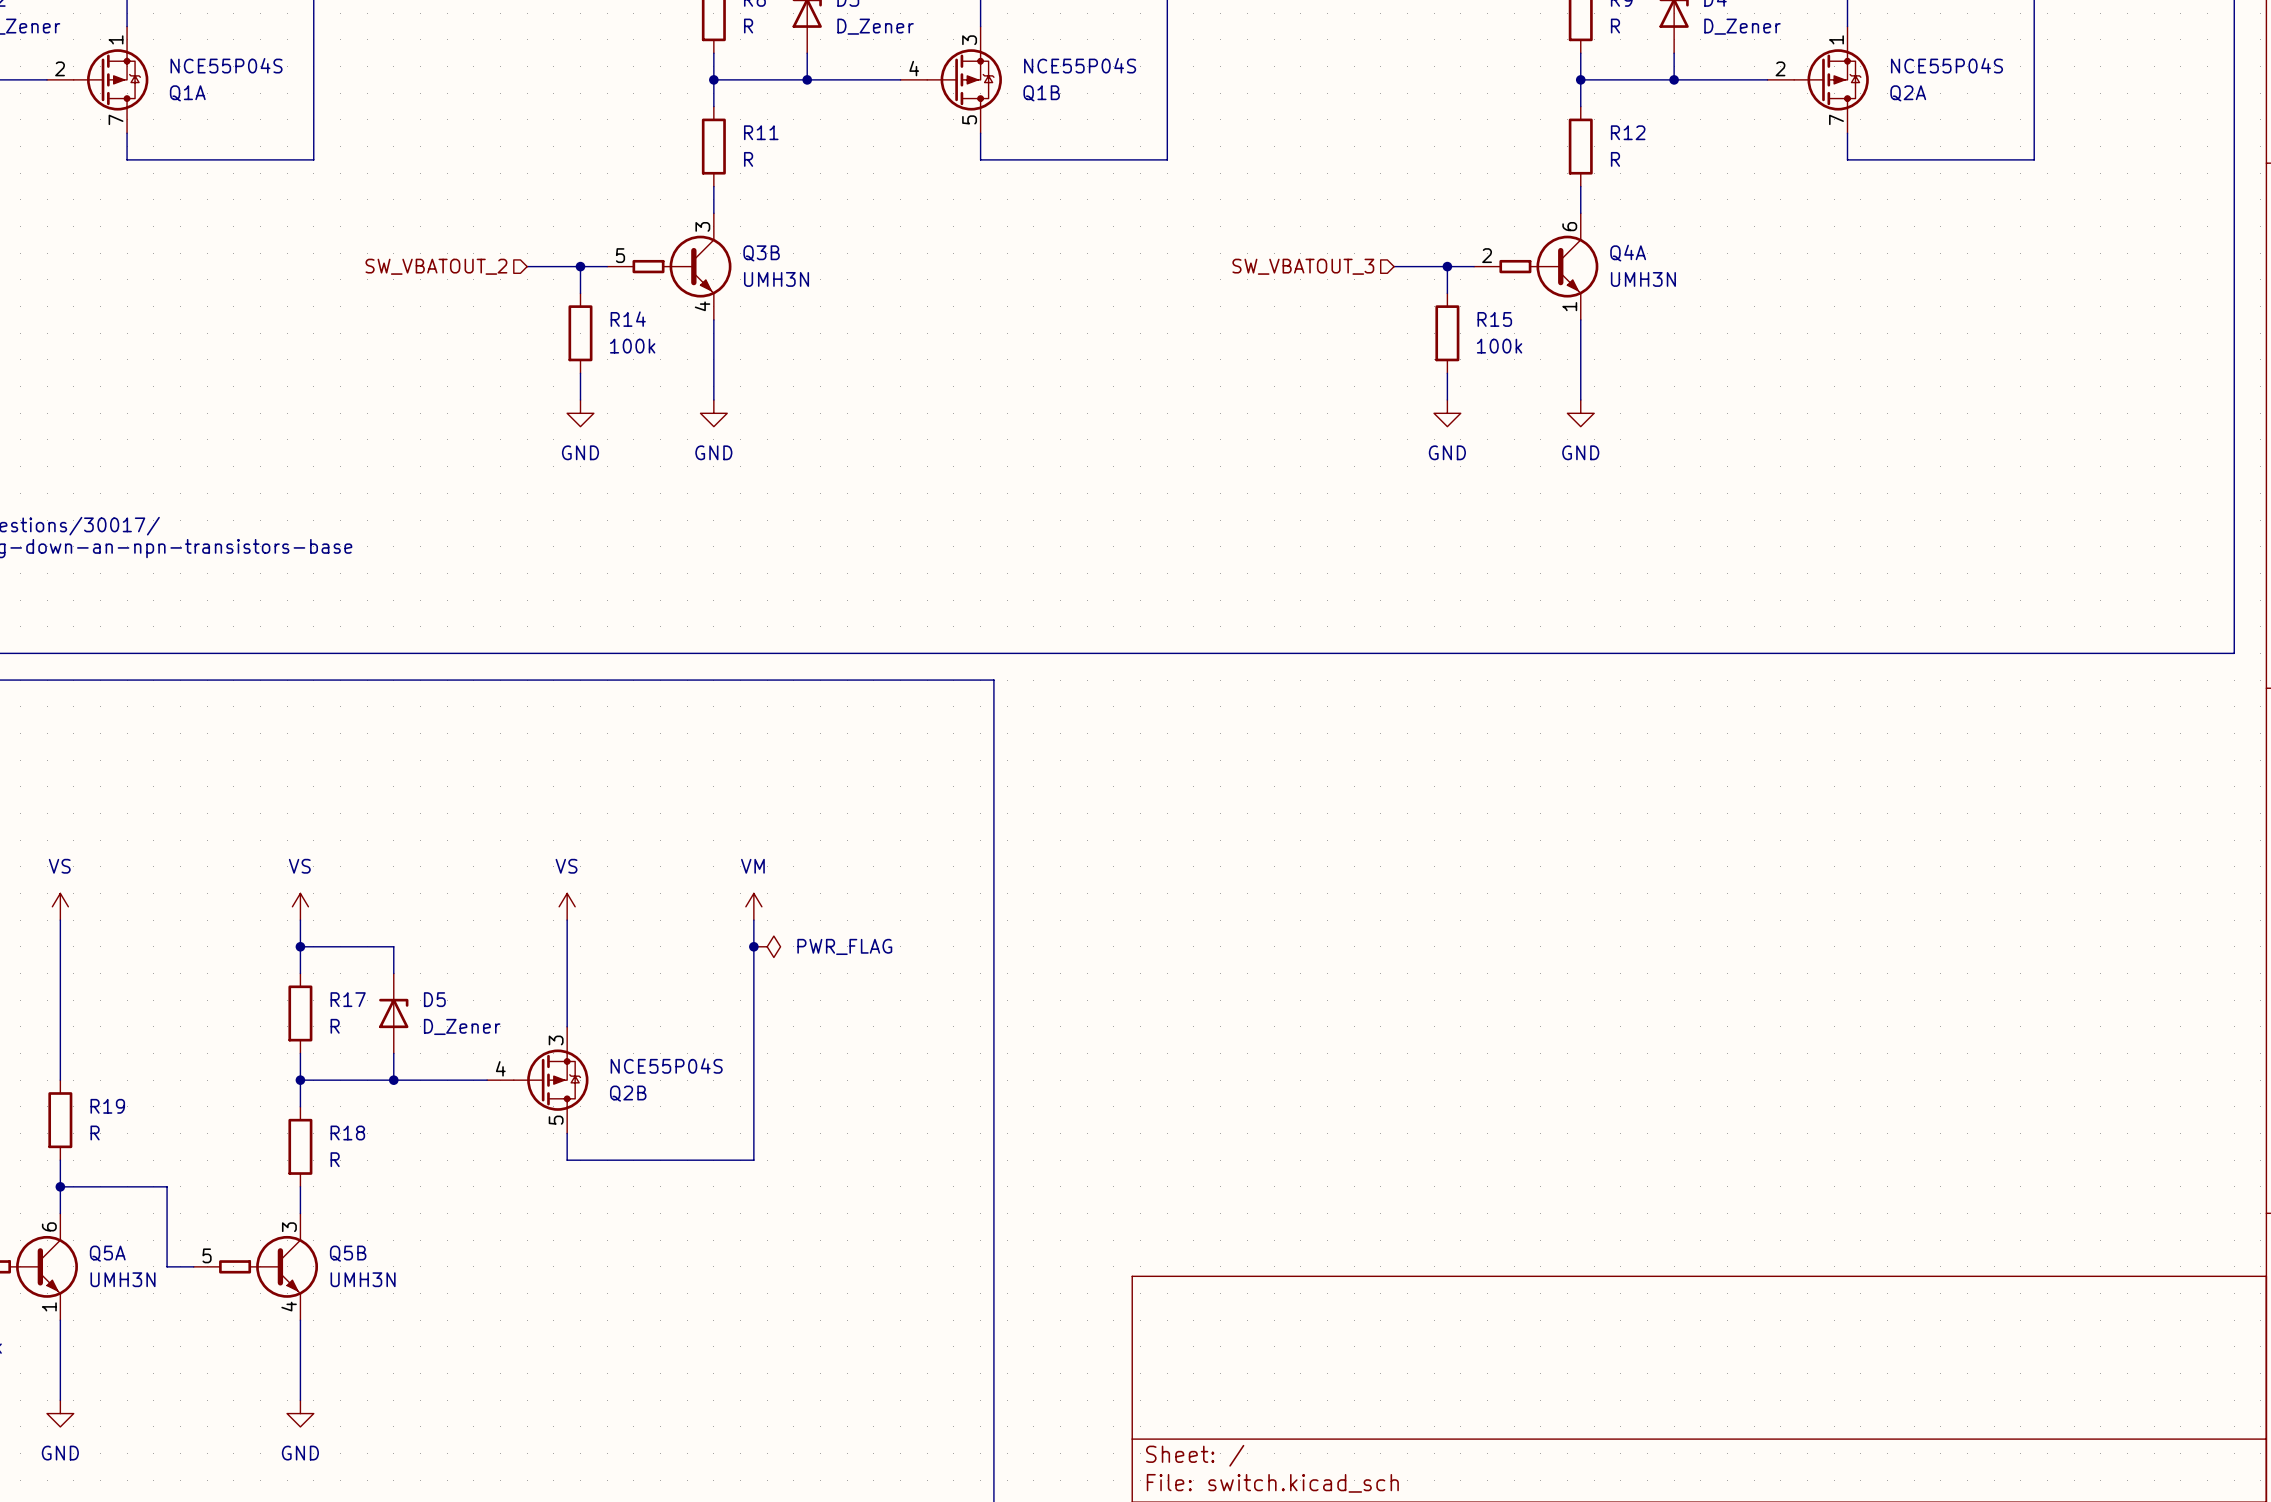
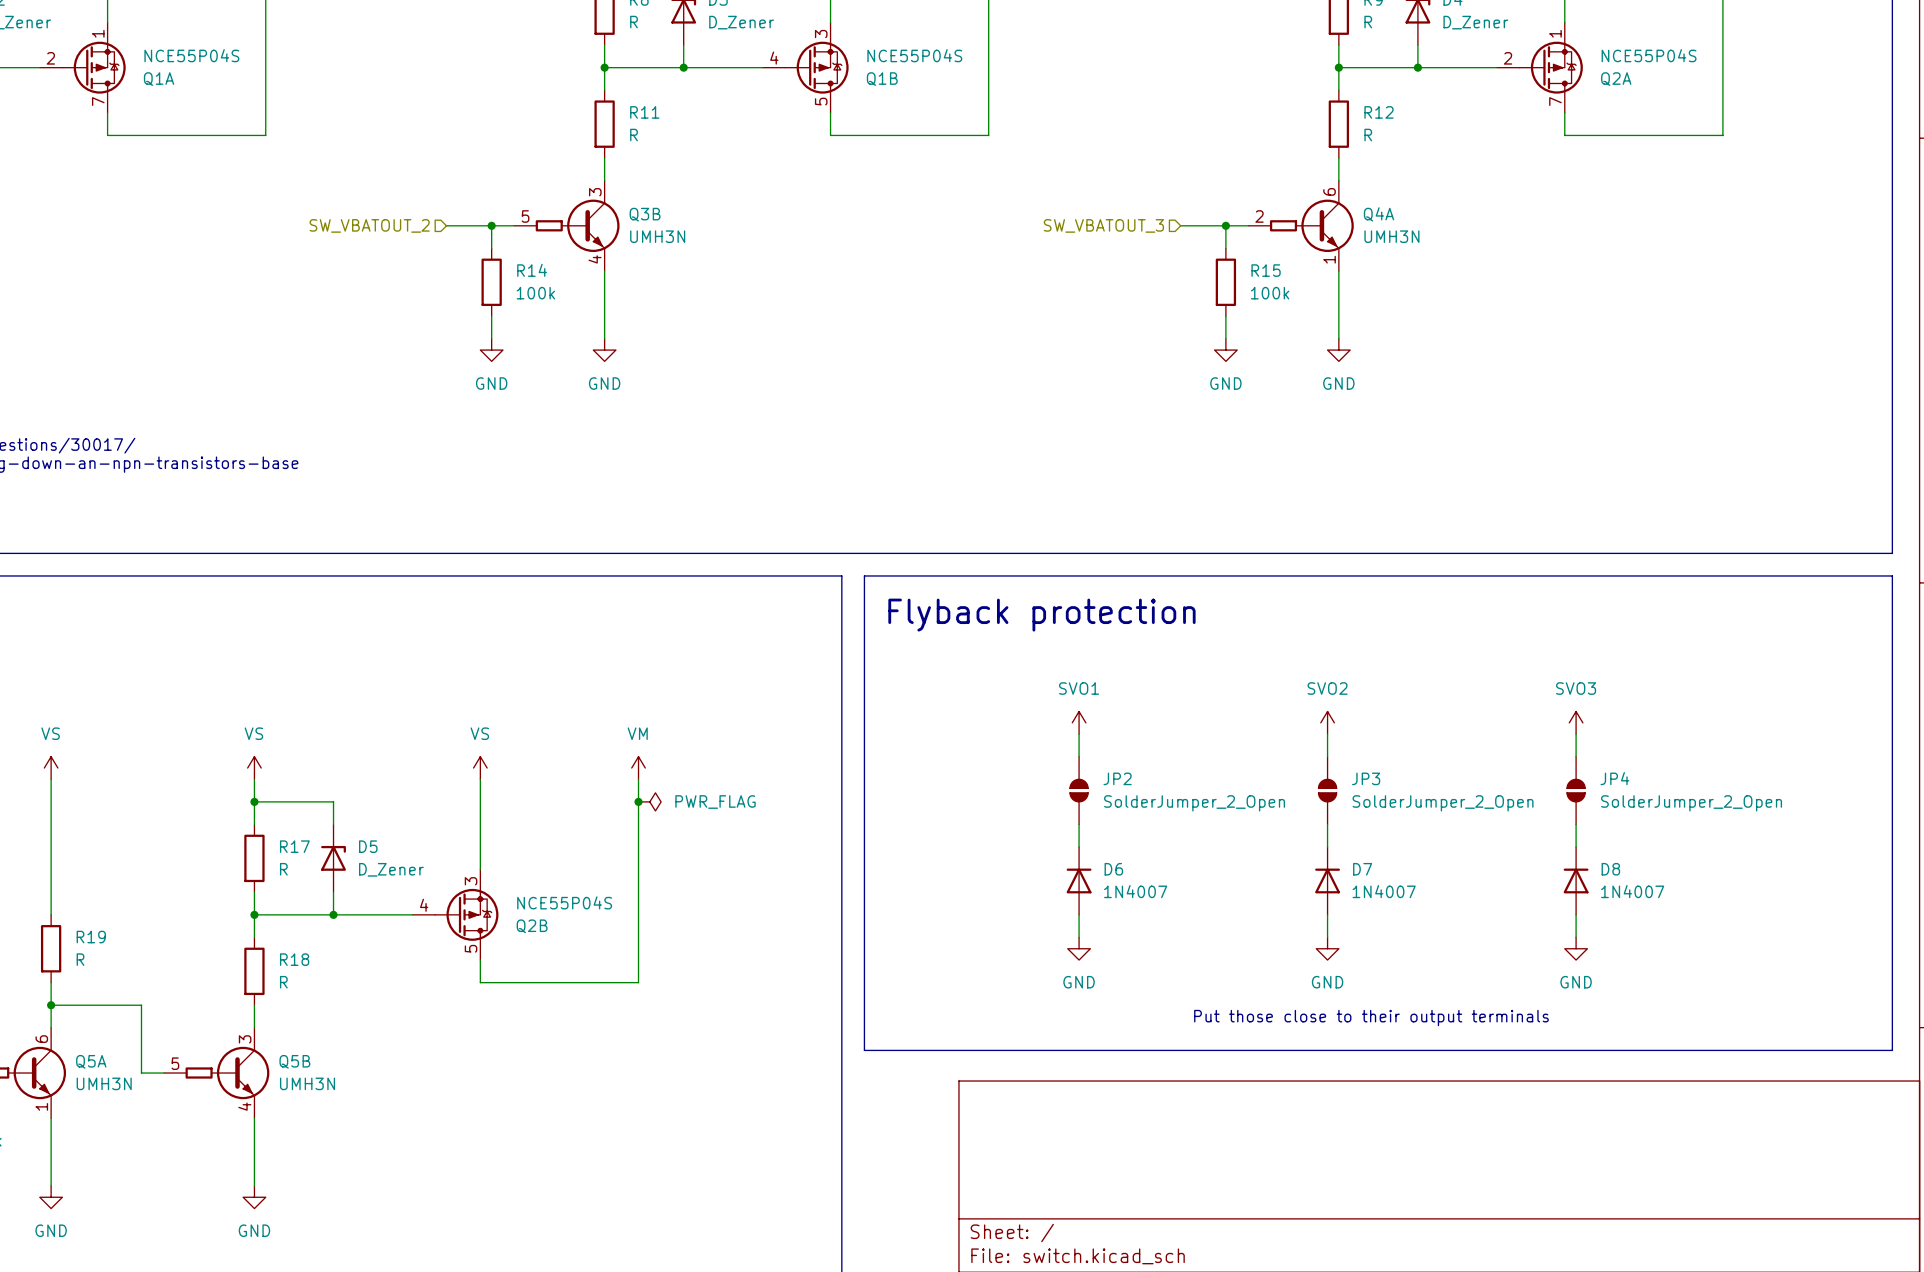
line: none -> (864, 575) (1892, 575) (1892, 1050) (864, 1050) (864, 575)
text: none -> Flyback protection (1041, 615)
power symbol: none -> SVO1 (1079, 722)
power symbol: none -> SVO2 (1327, 722)
power symbol: none -> SVO3 (1576, 722)
wire: none -> (1079, 734) (1079, 756)
wire: none -> (1327, 734) (1327, 756)
wire: none -> (1576, 734) (1576, 756)
JP2: none -> SolderJumper_2_Open (1079, 790)
JP3: none -> SolderJumper_2_Open (1327, 790)
JP4: none -> SolderJumper_2_Open (1576, 790)
wire: none -> (1079, 824) (1079, 847)
wire: none -> (1327, 824) (1327, 847)
wire: none -> (1576, 824) (1576, 847)
D6: none -> 1N4007 (1079, 880)
D7: none -> 1N4007 (1327, 880)
D8: none -> 1N4007 (1576, 880)
wire: none -> (1079, 914) (1079, 937)
wire: none -> (1327, 914) (1327, 937)
wire: none -> (1576, 914) (1576, 937)
power symbol: none -> GND (1079, 948)
power symbol: none -> GND (1327, 948)
power symbol: none -> GND (1576, 948)
text: none -> Put those close to their output terminals (1371, 1018)

